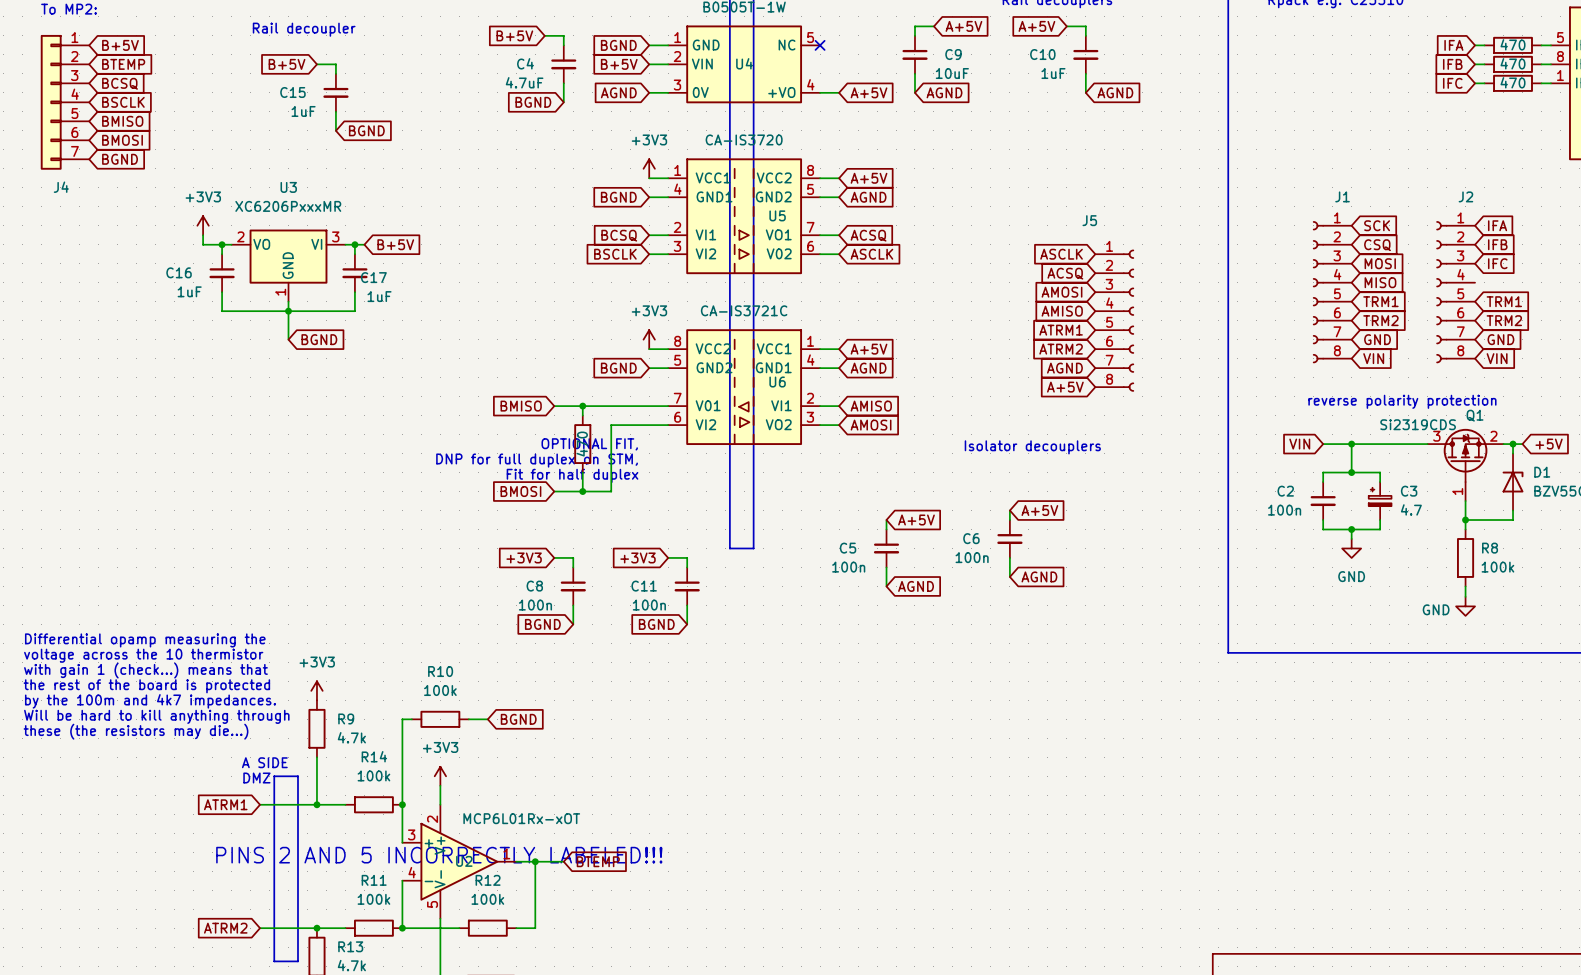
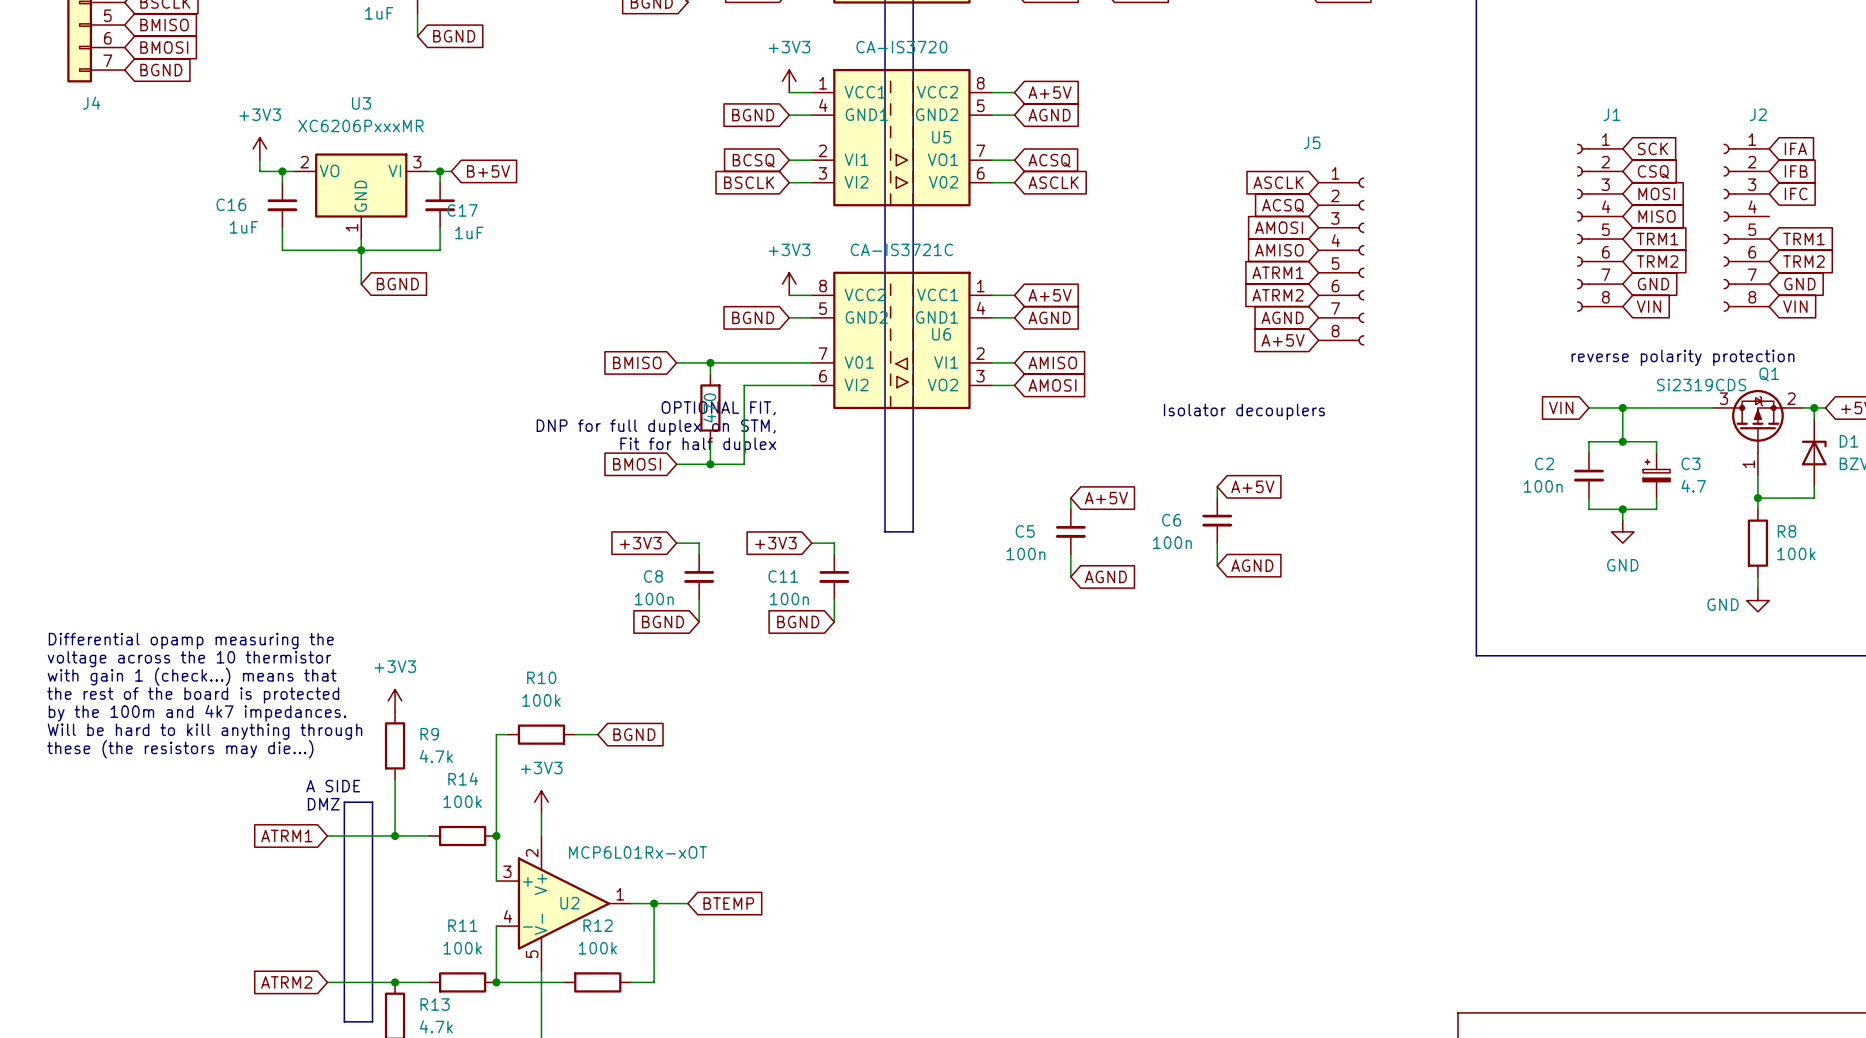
text: PINS 2 AND 5 INCORRECTLY LABELED!!! (439, 855) -> none

